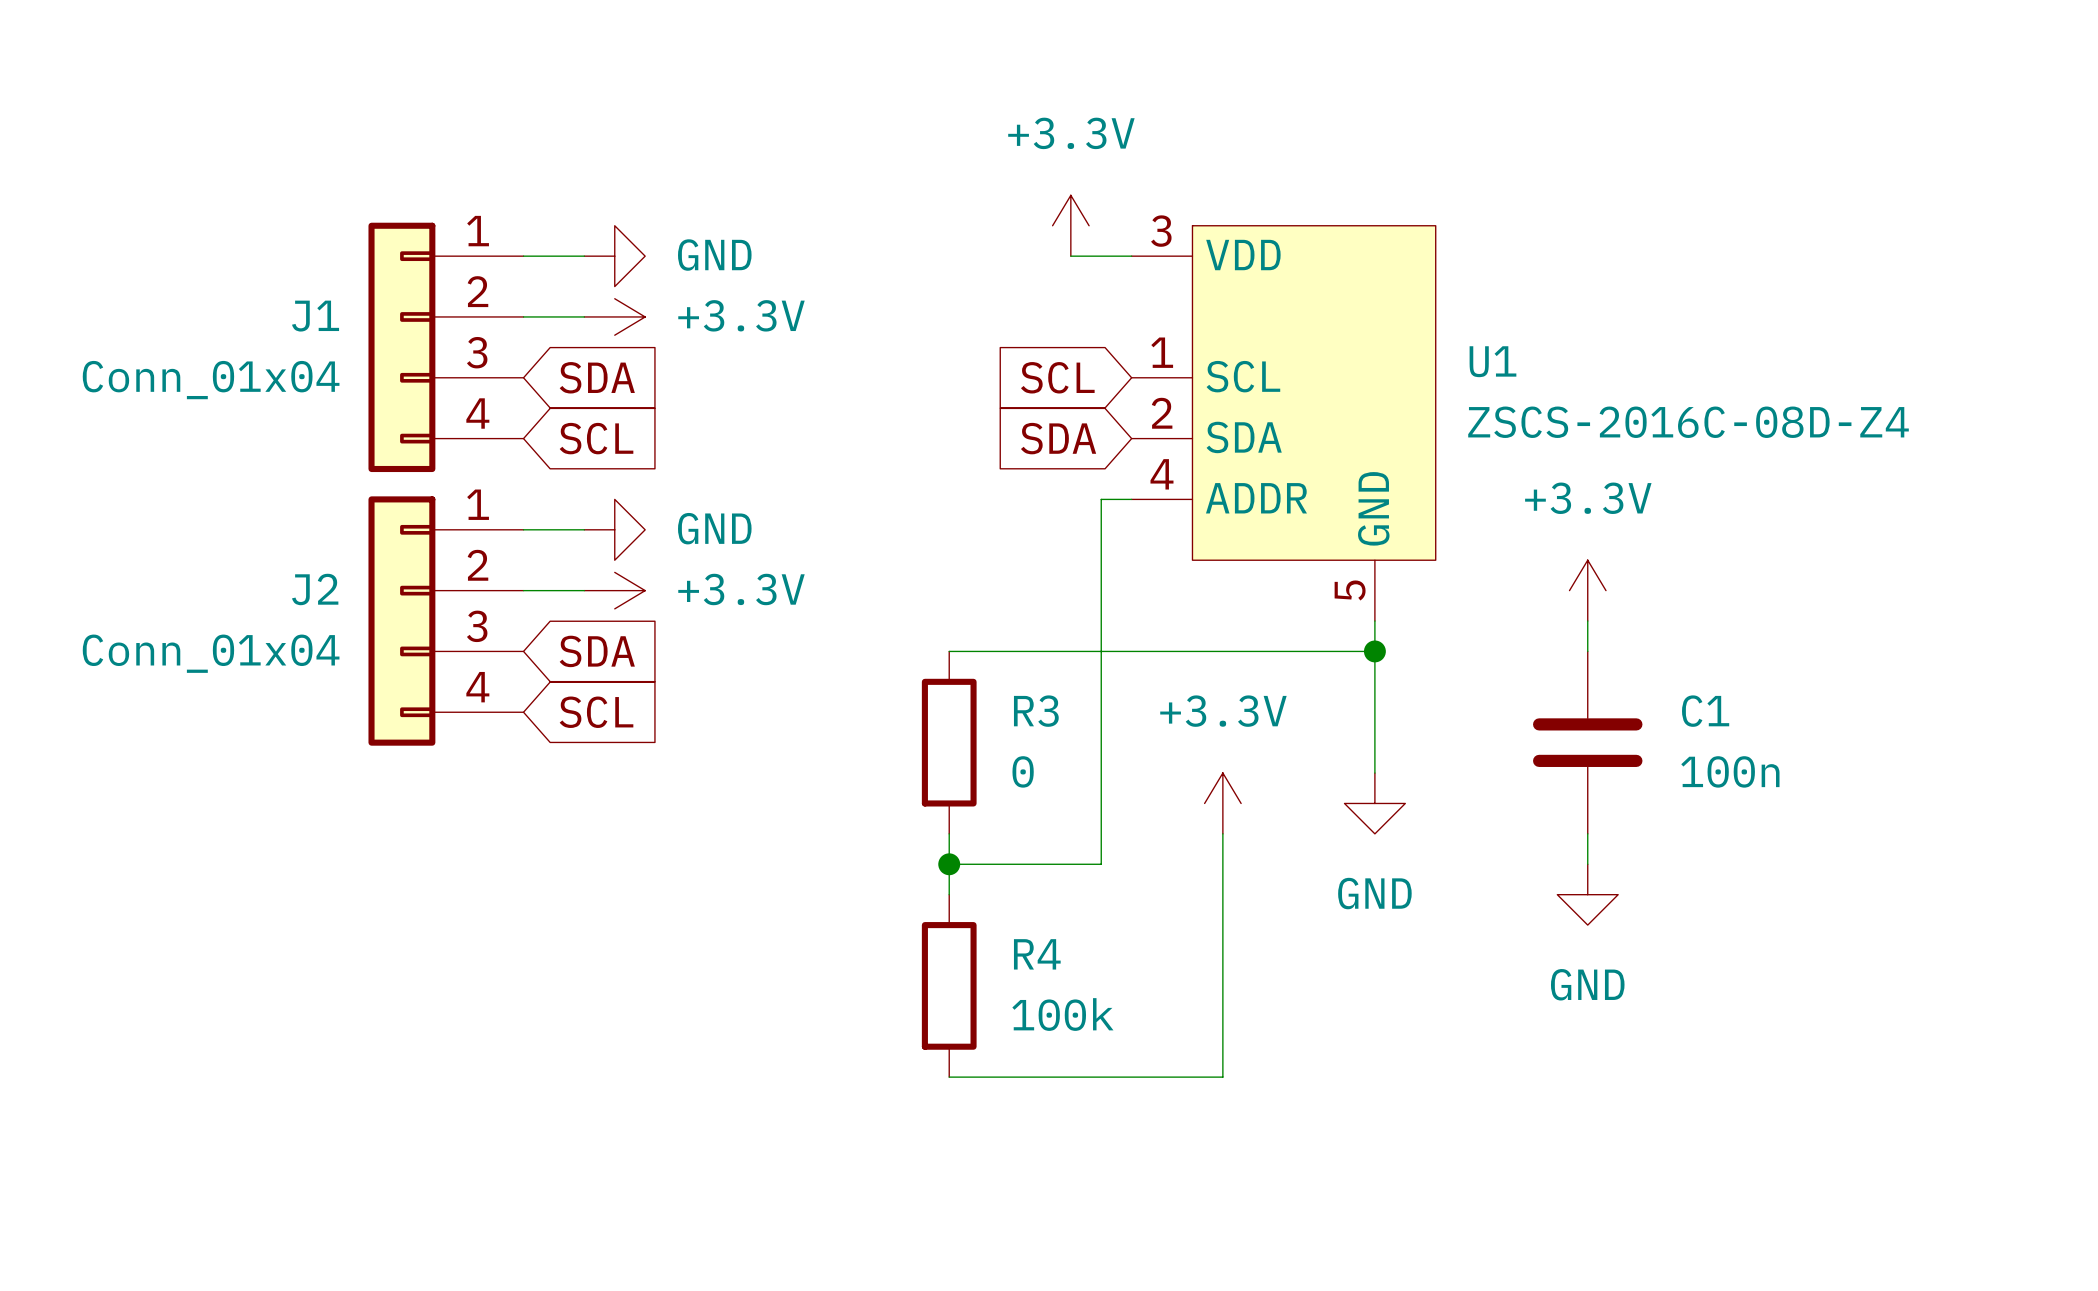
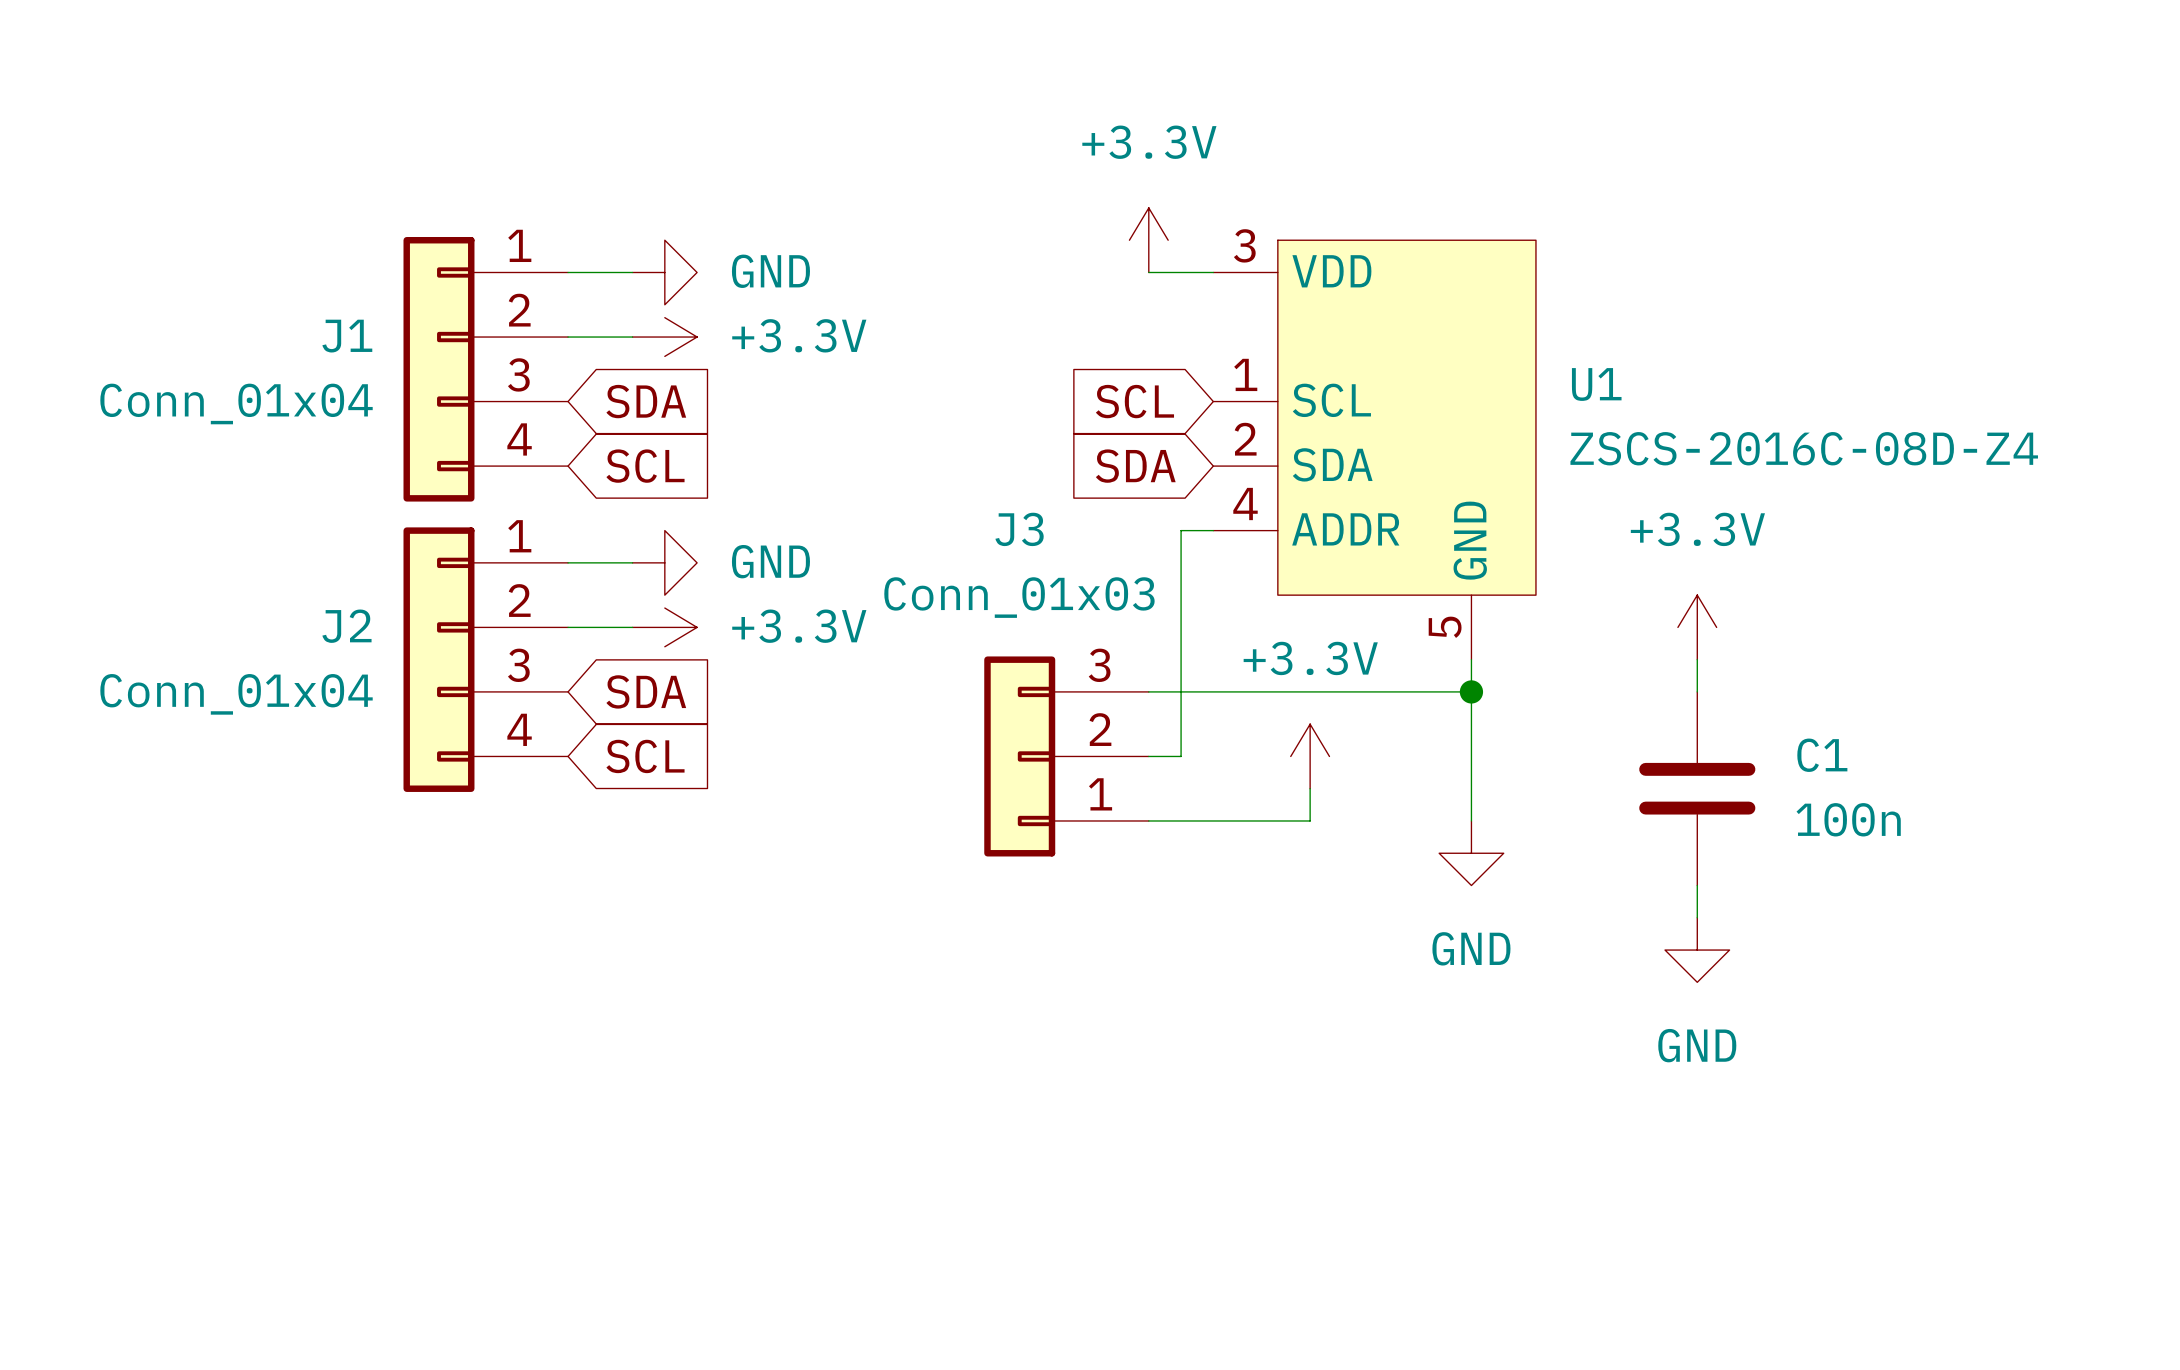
J3: none -> Conn_01x03 (1066, 756)
wire: (1101, 712) (1101, 864) (949, 864) -> (1181, 756) (1148, 756)
R3: 0 (949, 742) -> none
wire: none -> (1310, 788) (1310, 820) (1148, 820)
power symbol position: +3.3V (1222, 803) -> +3.3V (1310, 756)
wire: (949, 833) (949, 894) -> none
wire: (1222, 833) (1222, 1077) (949, 1077) -> none
junction: (949, 864) -> none
R4: 100k (949, 985) -> none

